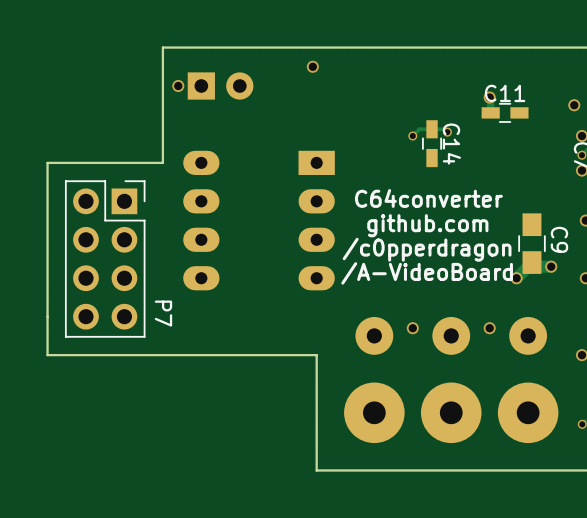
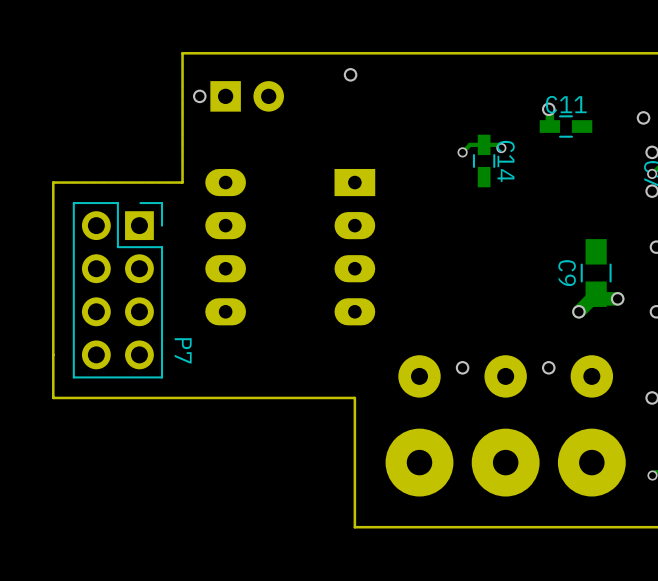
text: C64converter (428, 198) -> none
text: github.com (427, 225) -> none
C9 name position: C9 (559, 239) -> C9 (567, 273)
text: /c0pperdragon (427, 249) -> none
text: /A-VideoBoard (427, 273) -> none

